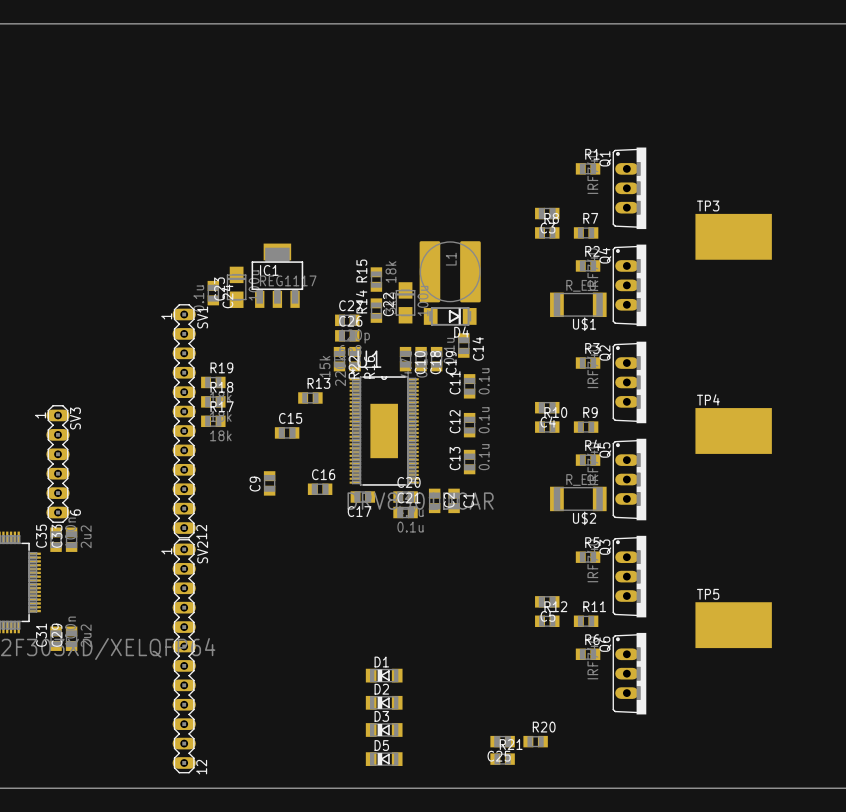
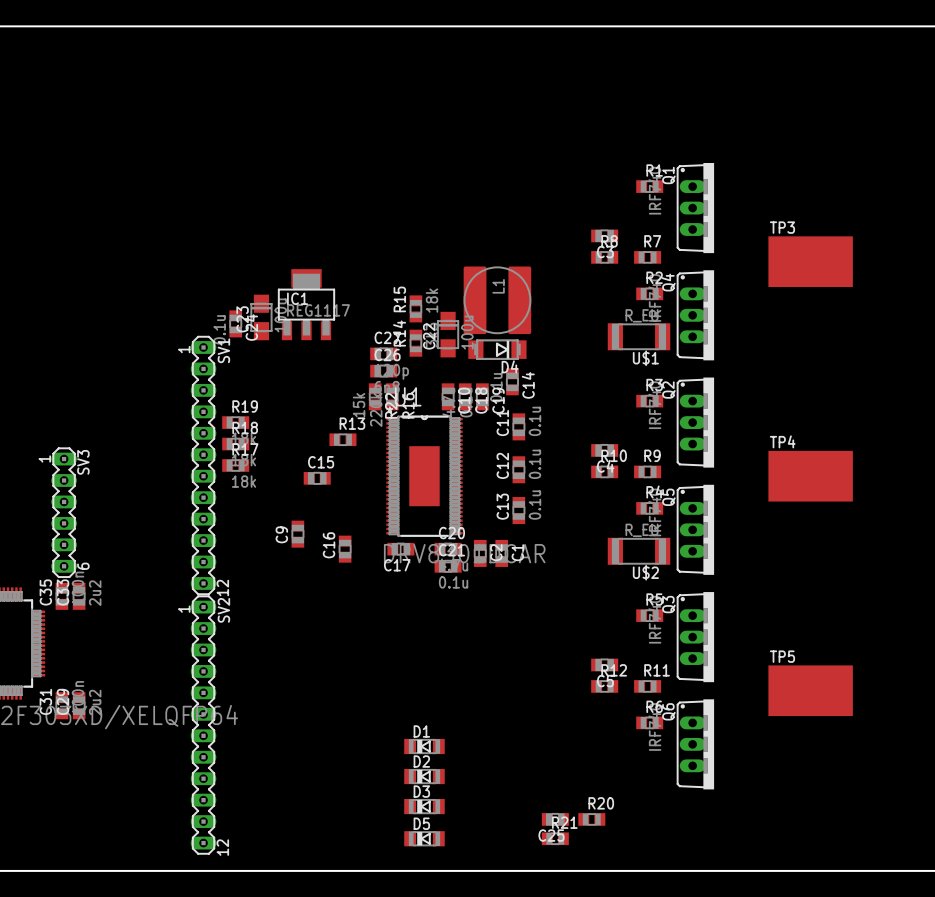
C16 name position: C16 (323, 474) -> C16 (329, 545)
C16 rotation: 0° (320, 489) -> 90° clockwise (345, 549)

